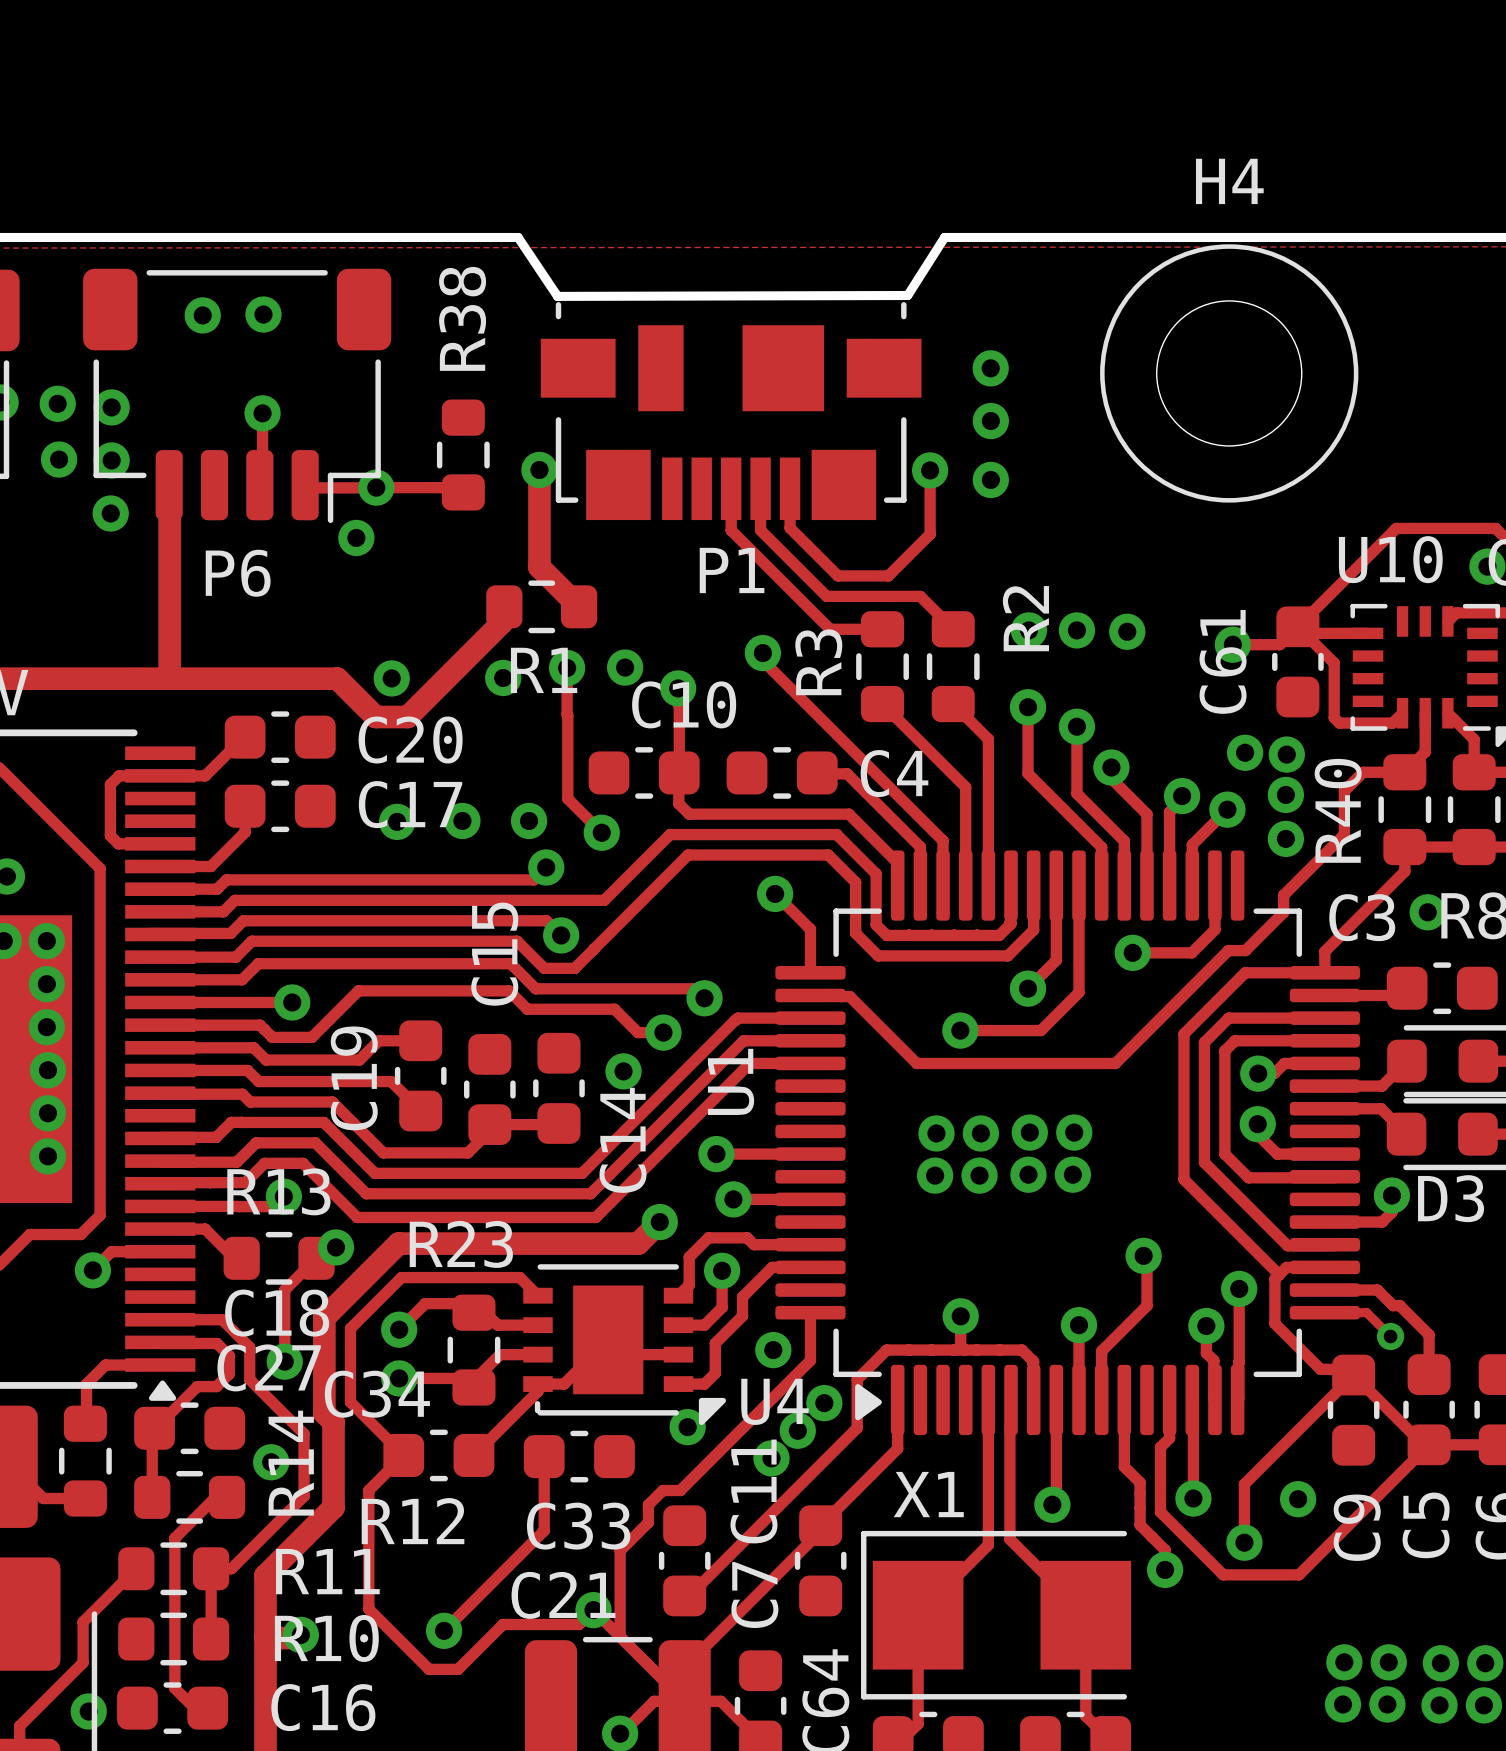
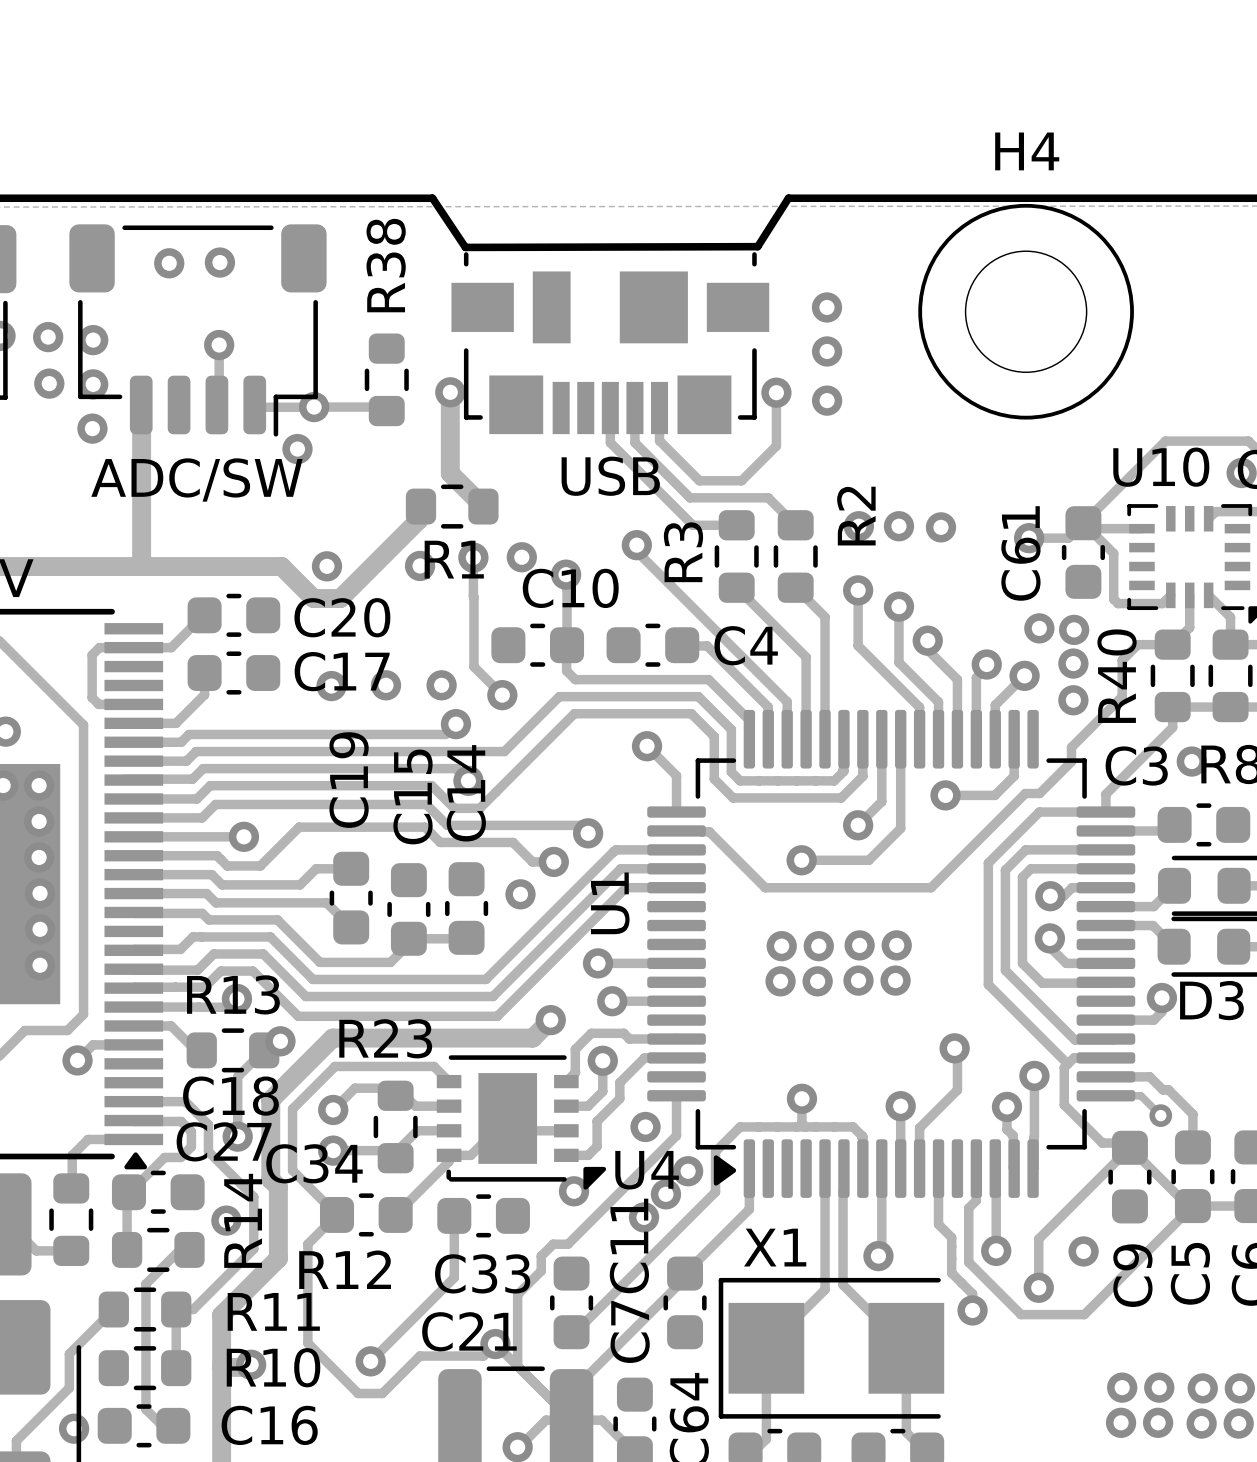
P1 name: P1 (732, 570) -> USB (610, 476)
P6 name: P6 (238, 573) -> ADC/SW (196, 479)
C19 name position: C19 (354, 1078) -> C19 (349, 780)
C14 name position: C14 (623, 1140) -> C14 (466, 793)

